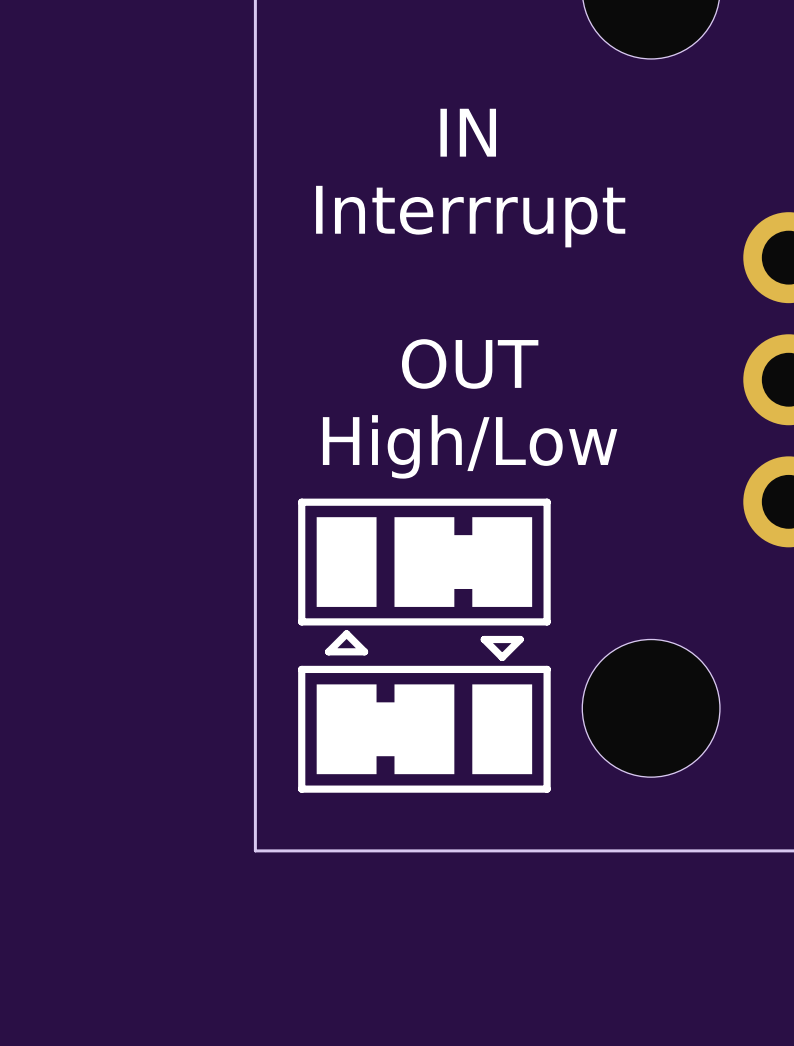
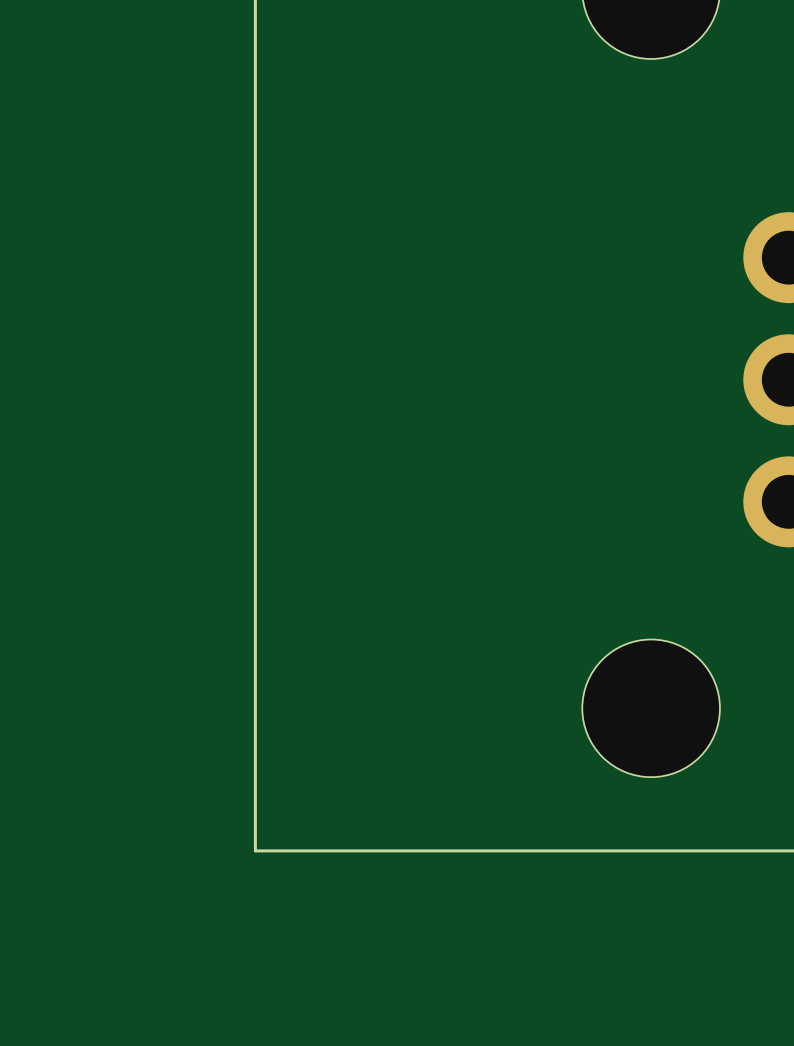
text: IN (468, 132) -> none
text: Interrrupt (470, 216) -> none
text: OUT (470, 363) -> none
text: High/Low (470, 446) -> none
drawing: [298, 498, 551, 793] -> none

